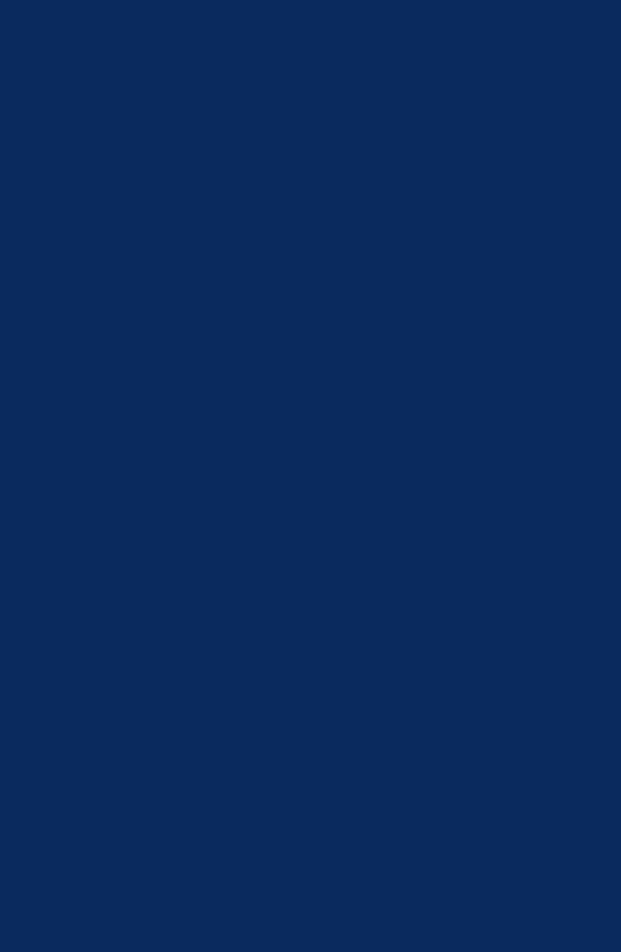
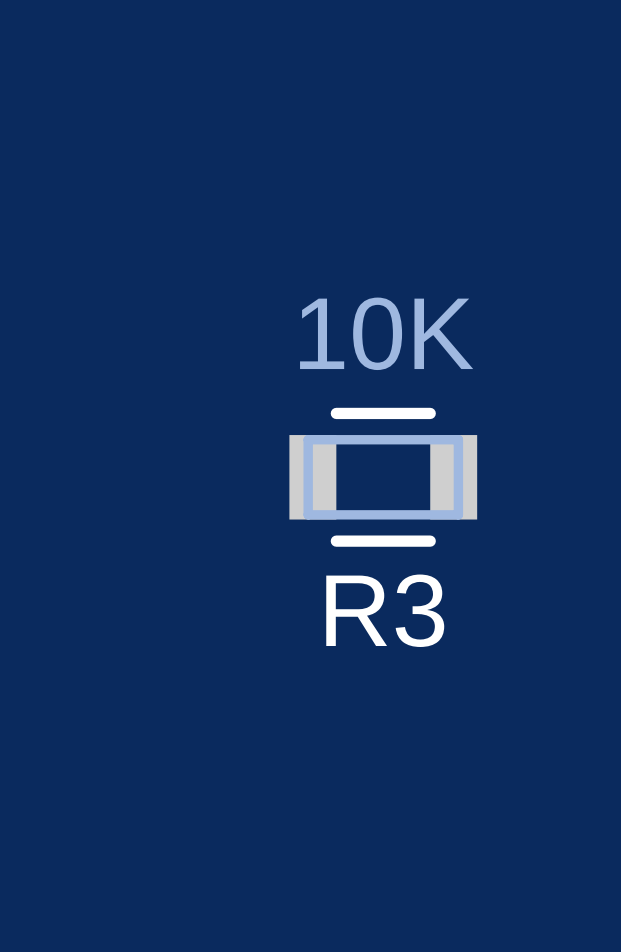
R3: none -> 10K (383, 477)

